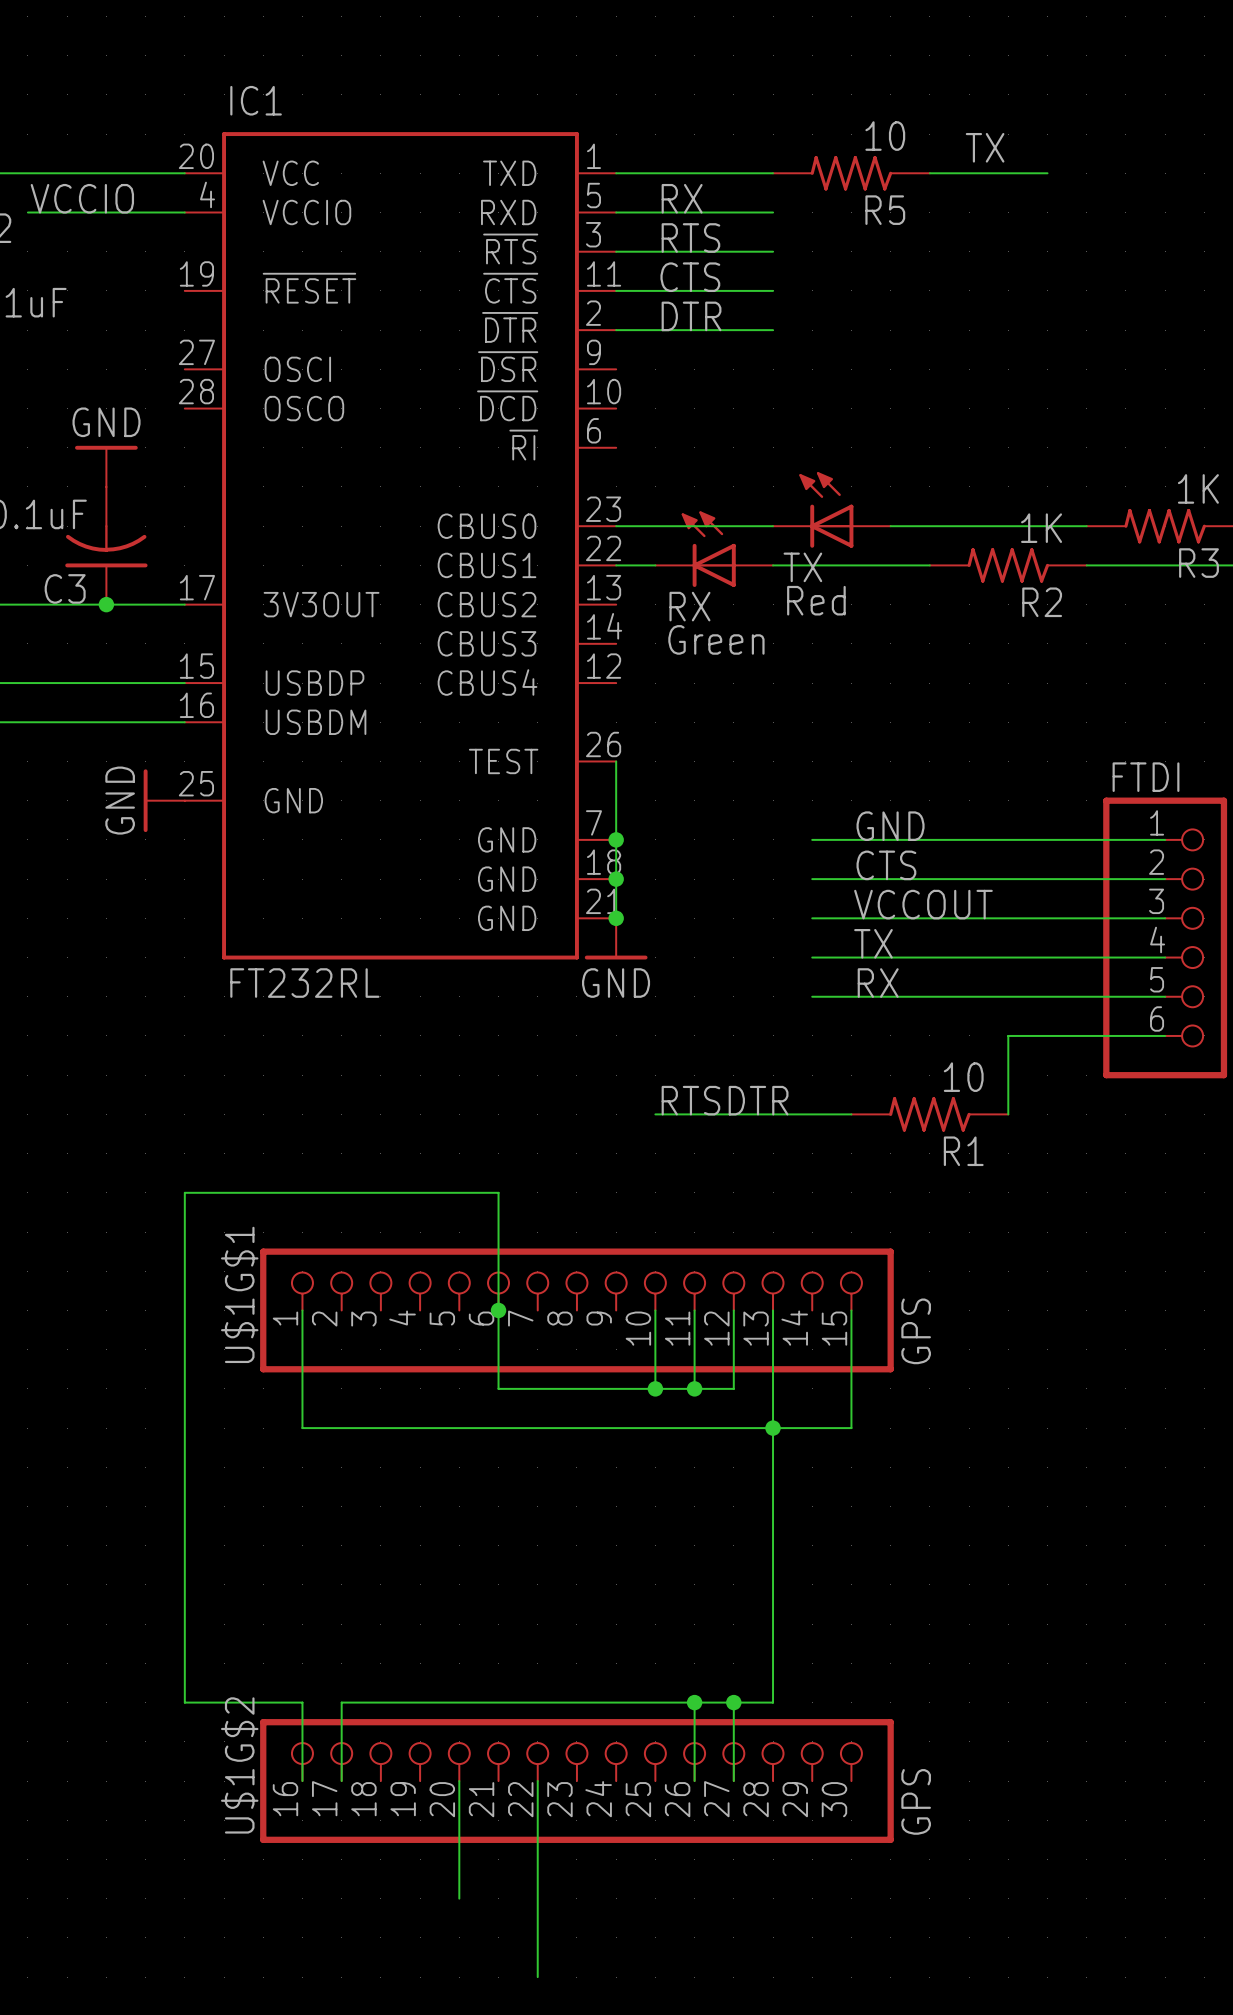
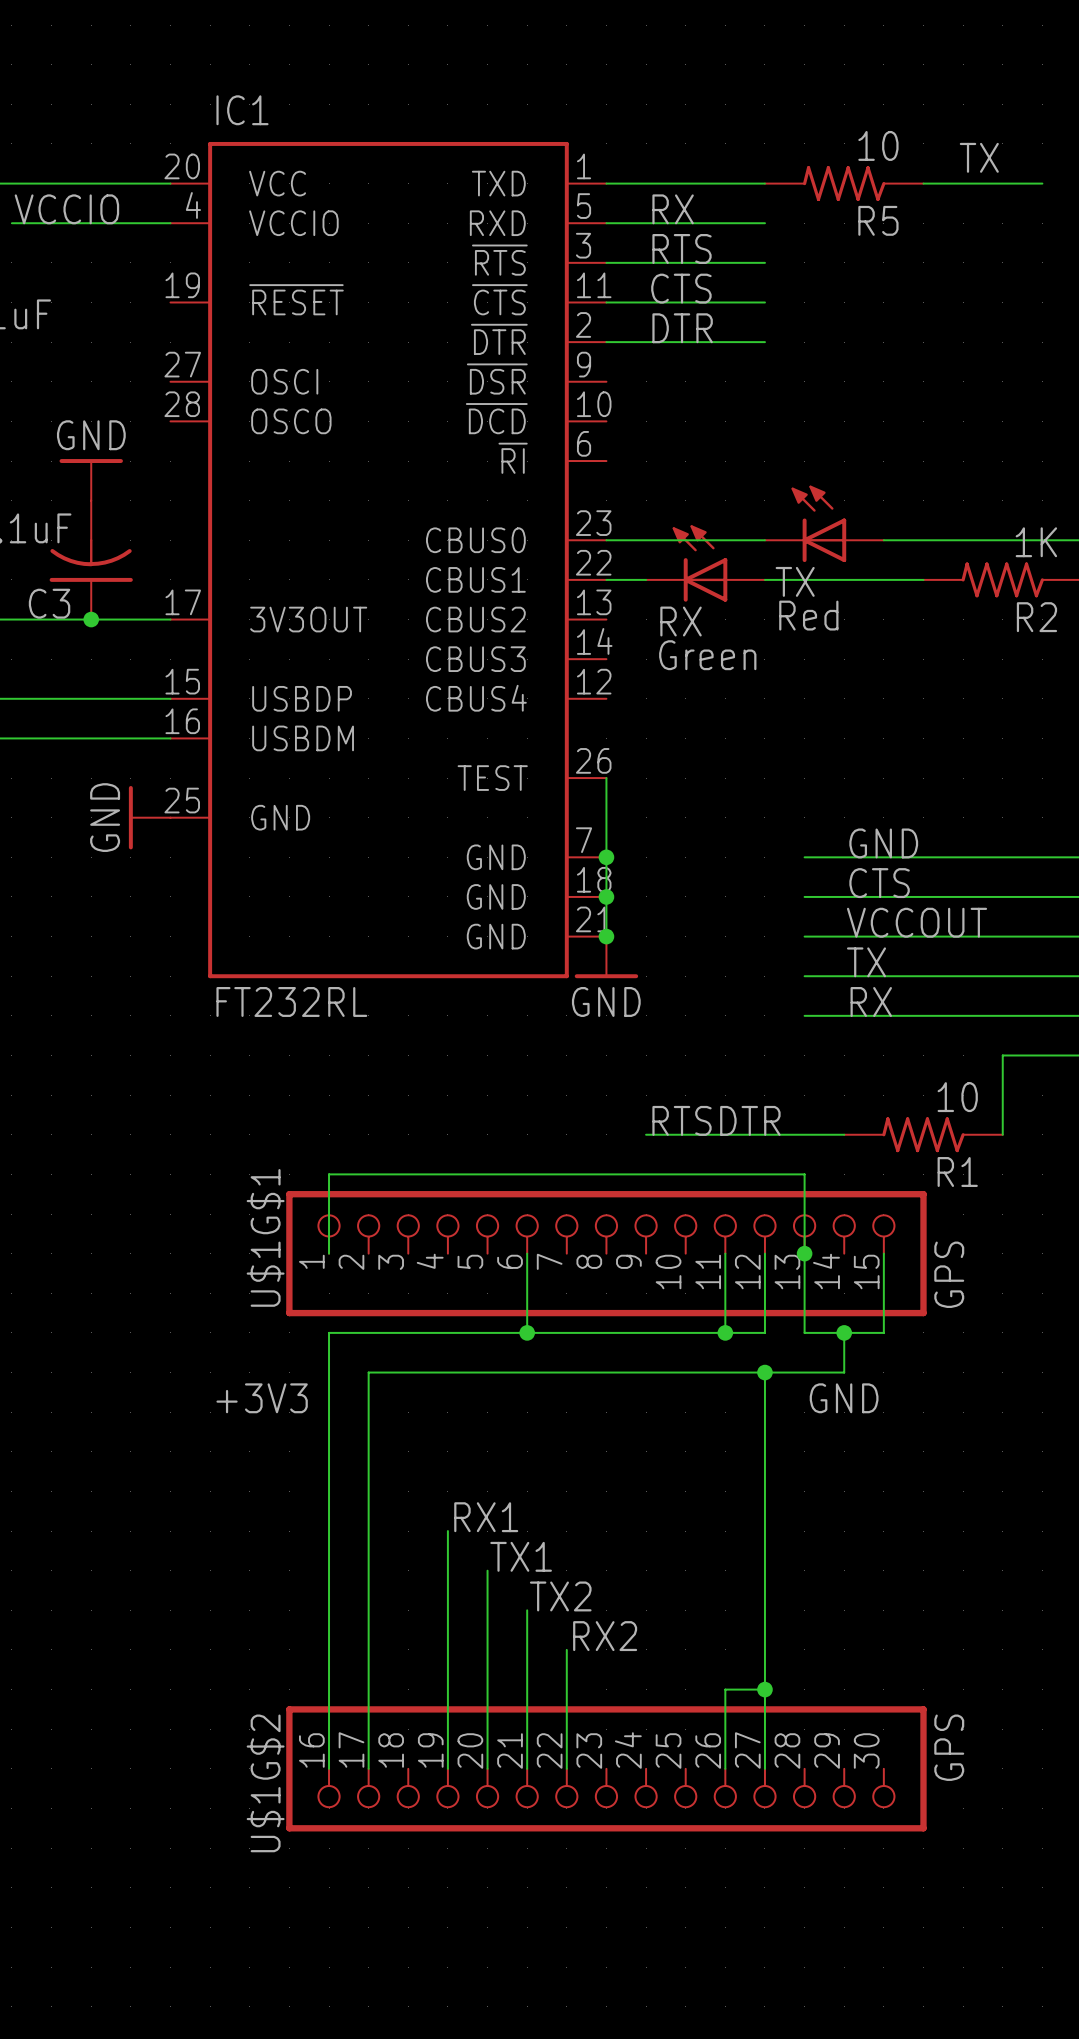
wire: none -> (329, 1253) (329, 1174) (804, 1174) (804, 1332) (883, 1332) (883, 1253)
wire: none -> (764, 1253) (764, 1332) (329, 1332) (329, 1729)
junction: none -> (804, 1253)
wire: (302, 1310) (302, 1428) (851, 1428) (851, 1349) -> (368, 1768) (368, 1372) (844, 1372)
junction position: (498, 1310) -> (527, 1332)
U$1G$1 position: (576, 1310) -> (606, 1253)
wire: (655, 1310) (655, 1388) -> (527, 1253) (527, 1332)
wire: (694, 1310) (694, 1388) -> none
wire: (733, 1310) (733, 1388) (498, 1388) (498, 1192) (184, 1192) (184, 1702) (302, 1702) (302, 1781) -> (725, 1332) (725, 1253)
junction: none -> (725, 1332)
wire: (773, 1310) (773, 1349) -> none
junction: none -> (844, 1332)
junction: none -> (764, 1372)
label: none -> +3V3 (262, 1398)
label: none -> GND (844, 1398)
junction: (655, 1388) -> none
junction: (694, 1388) -> none
junction: (773, 1428) -> none
label: none -> RX1 (486, 1517)
wire: none -> (447, 1531) (447, 1768)
label: none -> TX1 (521, 1556)
label: none -> TX2 (560, 1596)
wire: none -> (527, 1610) (527, 1768)
label: none -> RX2 (605, 1636)
wire: none -> (764, 1689) (725, 1689) (725, 1729)
junction: none -> (764, 1689)
wire: (341, 1702) (773, 1702) -> (764, 1768) (764, 1729)
wire: (694, 1702) (694, 1781) -> none
junction: (694, 1702) -> none
junction: (733, 1702) -> none
wire: (341, 1741) (341, 1781) -> none
wire: (733, 1741) (733, 1781) -> none
wire: (459, 1781) (459, 1898) -> (566, 1649) (566, 1768)
wire: (537, 1781) (537, 1977) -> (487, 1570) (487, 1768)
U$1G$2 flip: as is (576, 1781) -> up-down (606, 1768)

